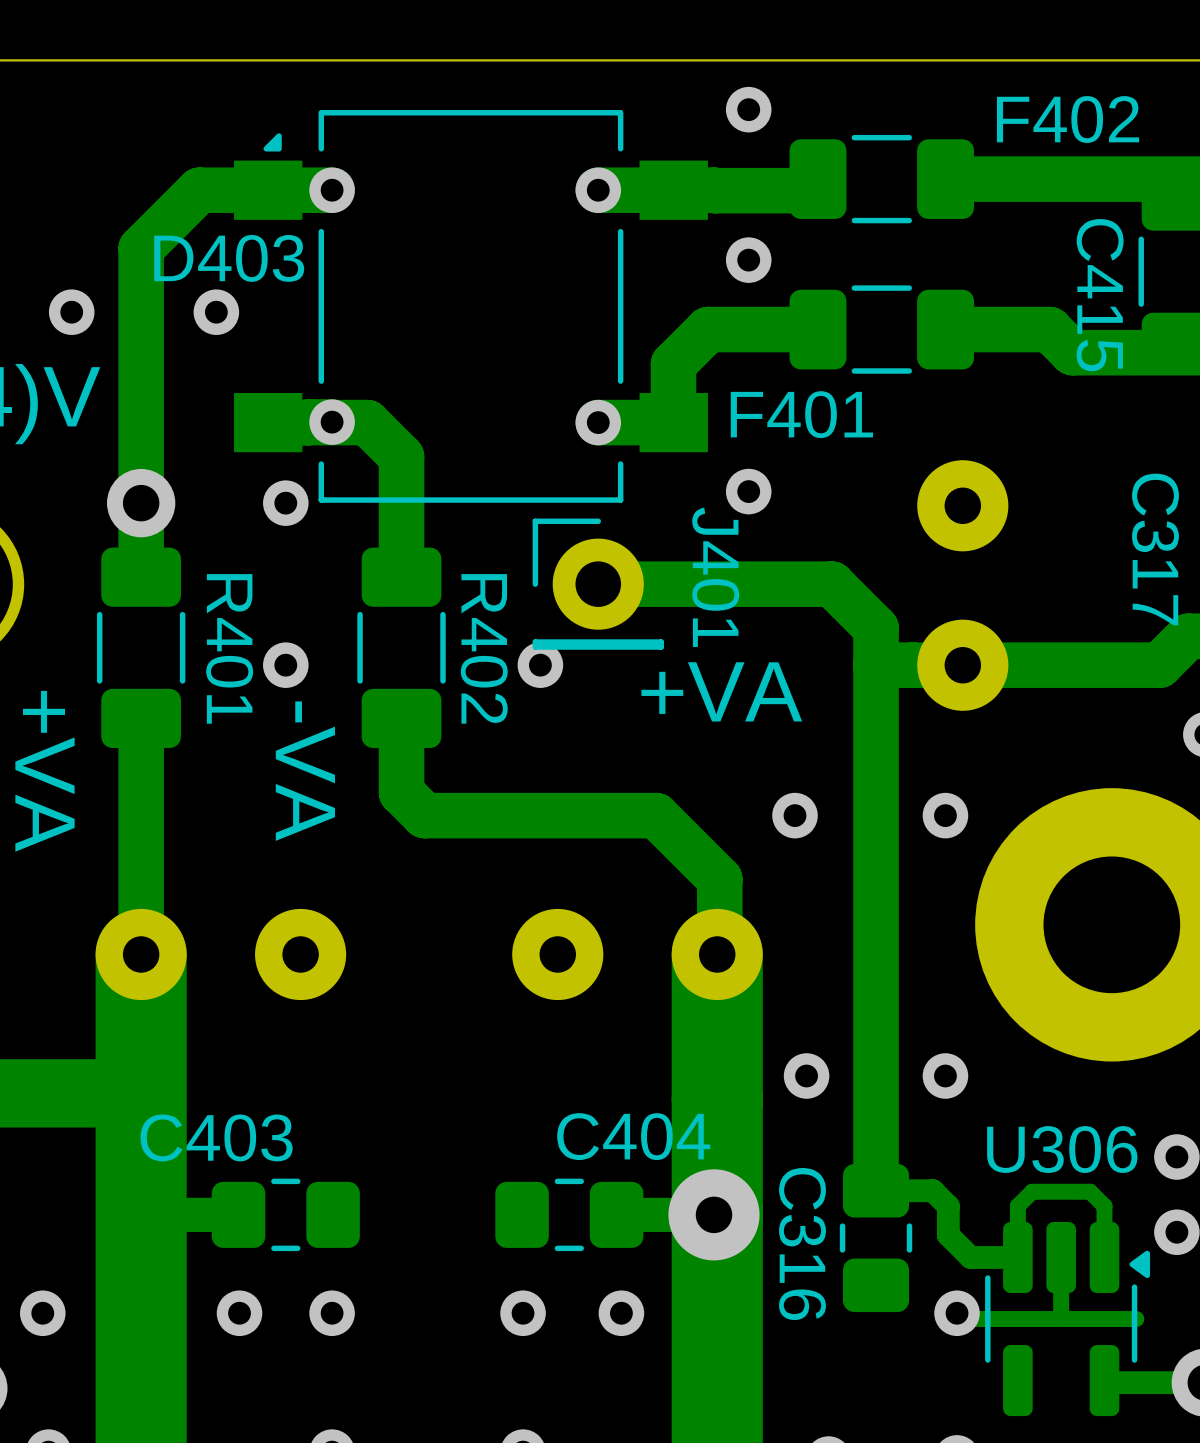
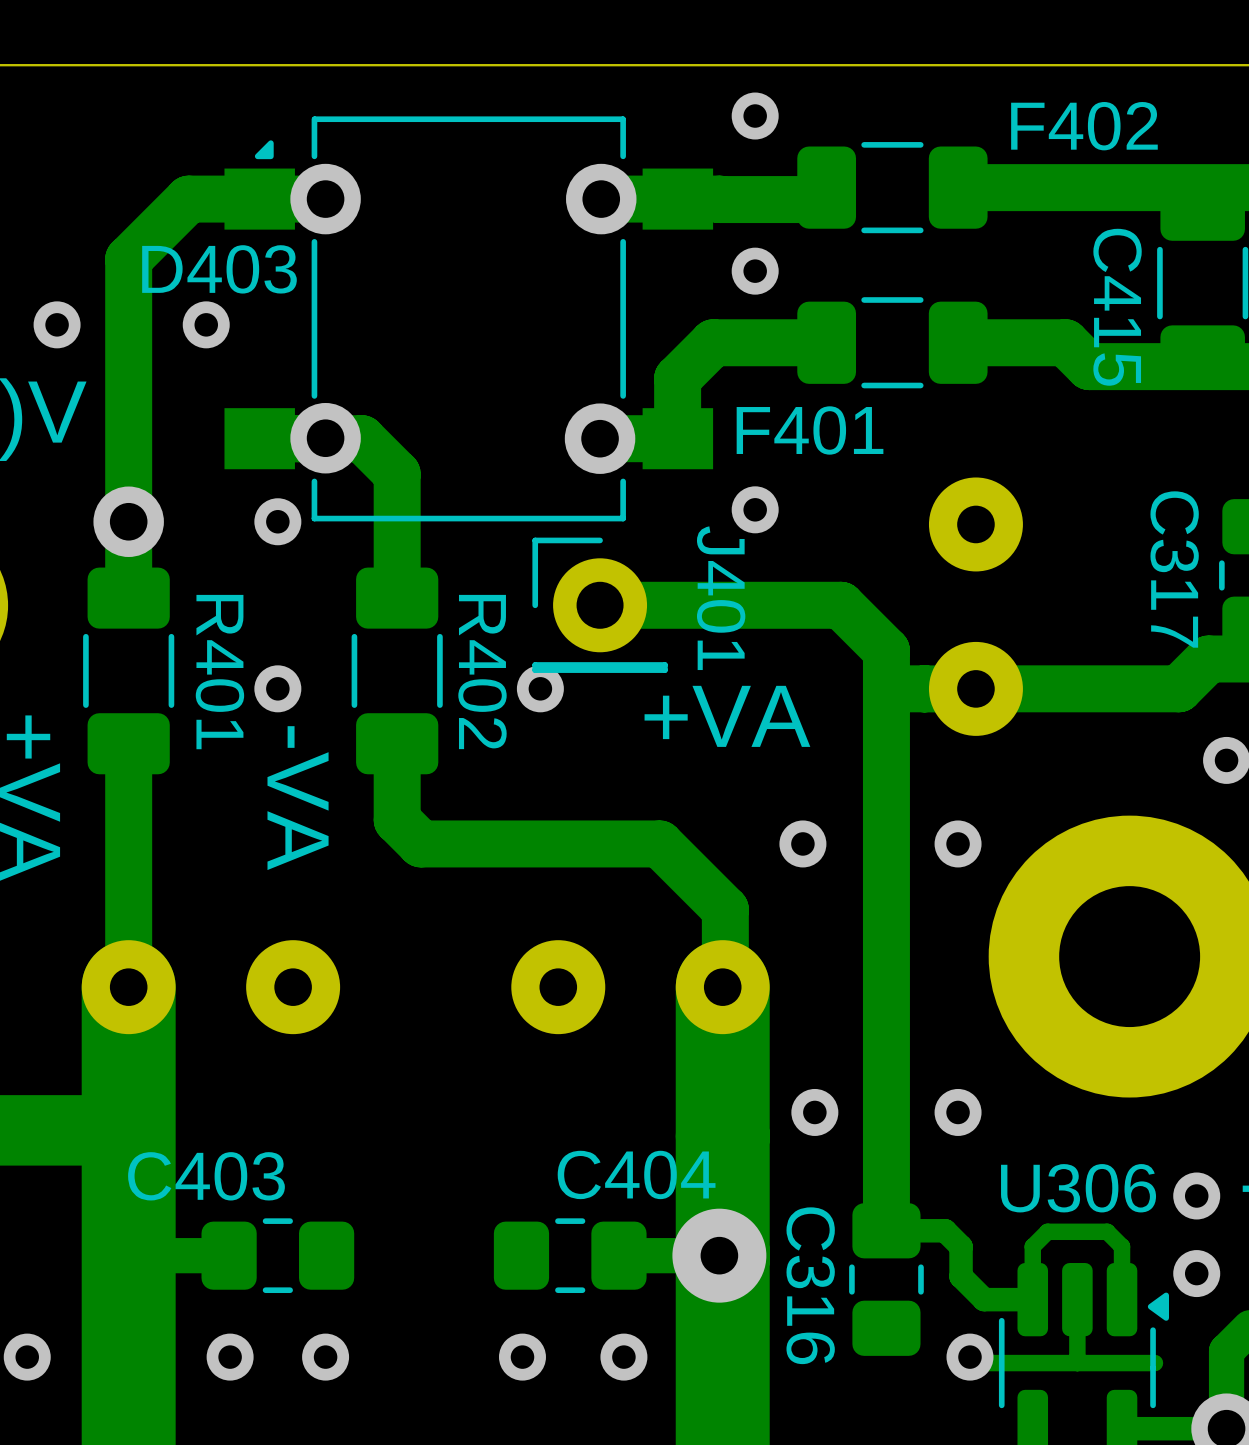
via size: [309, 167, 355, 214] -> [290, 163, 361, 235]
via size: [575, 167, 622, 214] -> [566, 163, 637, 235]
via size: [309, 399, 355, 445] -> [290, 402, 361, 474]
via size: [575, 399, 622, 446] -> [564, 403, 636, 474]

